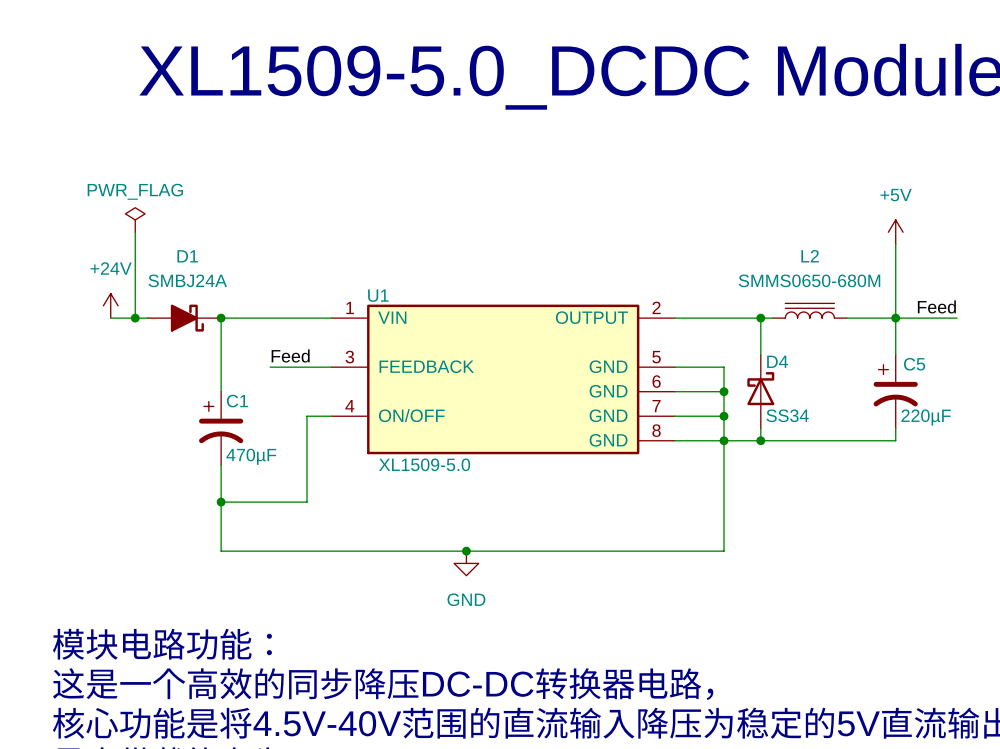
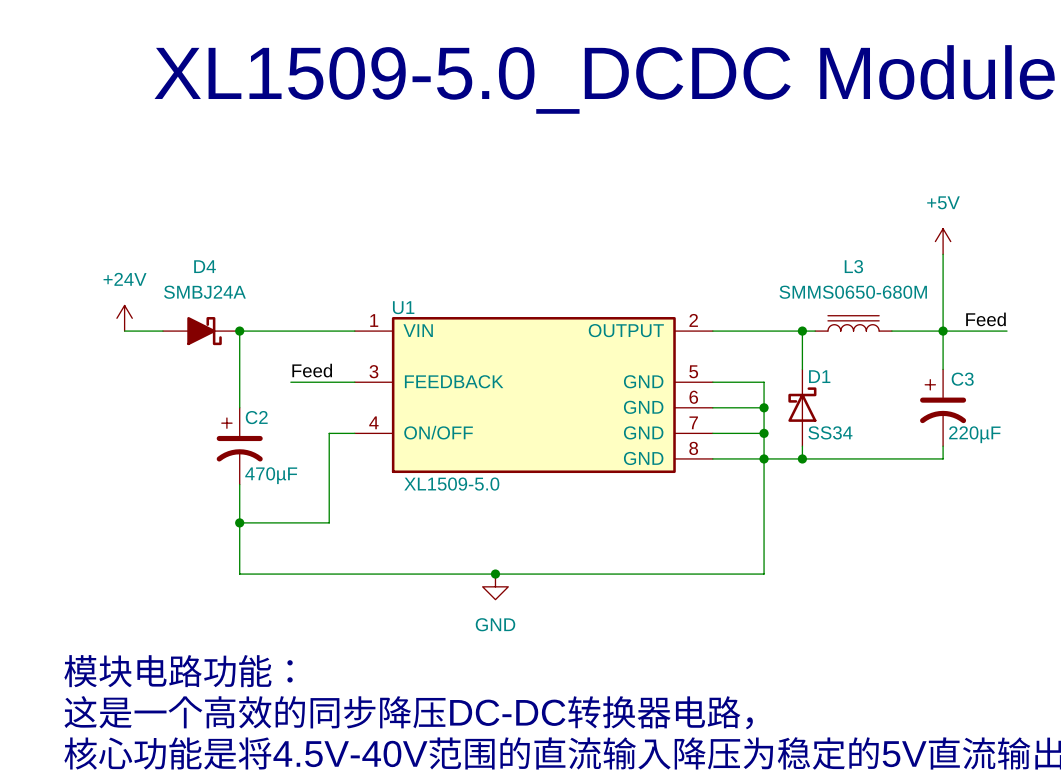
power symbol: PWR_FLAG (135, 219) -> none
wire: (135, 232) (135, 318) -> none
D1 name: D1 (187, 256) -> D4 (205, 266)
L2 name: L2 (810, 256) -> L3 (853, 266)
junction: (135, 318) -> none
D4 name: D4 (777, 361) -> D1 (819, 376)
C5 name: C5 (914, 364) -> C3 (962, 379)
C1 name: C1 (237, 401) -> C2 (256, 417)

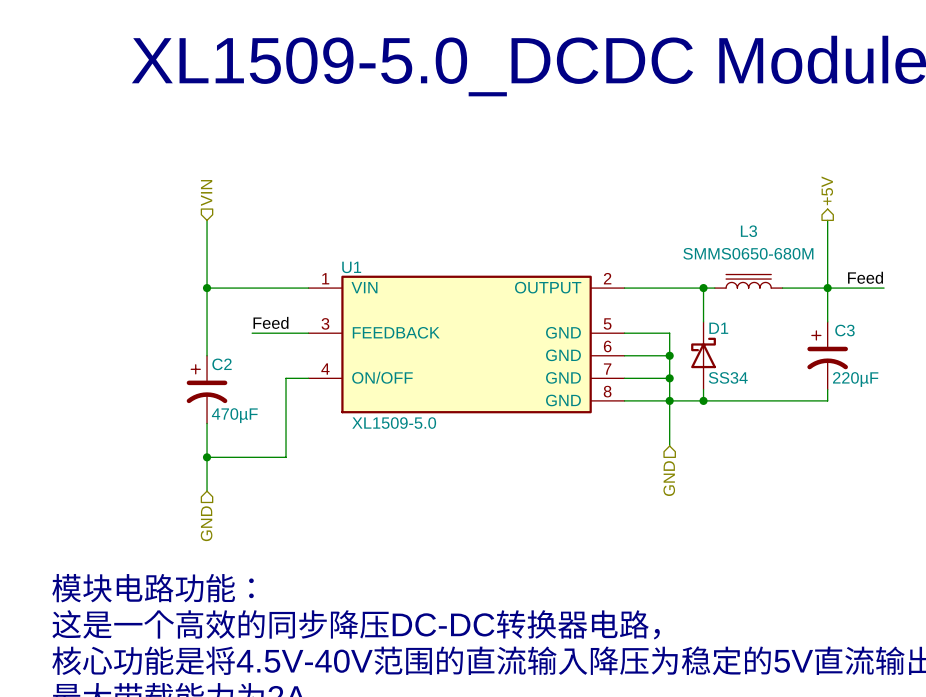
hierarchical label: none -> +5V (827, 190)
hierarchical label: none -> VIN (206, 192)
power symbol: +5V (943, 241) -> none
wire: none -> (207, 220) (207, 288)
power symbol: +24V (124, 318) -> none
wire: (124, 331) (162, 331) -> none
D4: SMBJ24A (201, 331) -> none
wire: (764, 510) (764, 574) (239, 574) (239, 561) -> none
hierarchical label: none -> GND (669, 478)
junction: (495, 574) -> none
power symbol: GND (495, 586) -> none
hierarchical label: none -> GND (206, 523)

